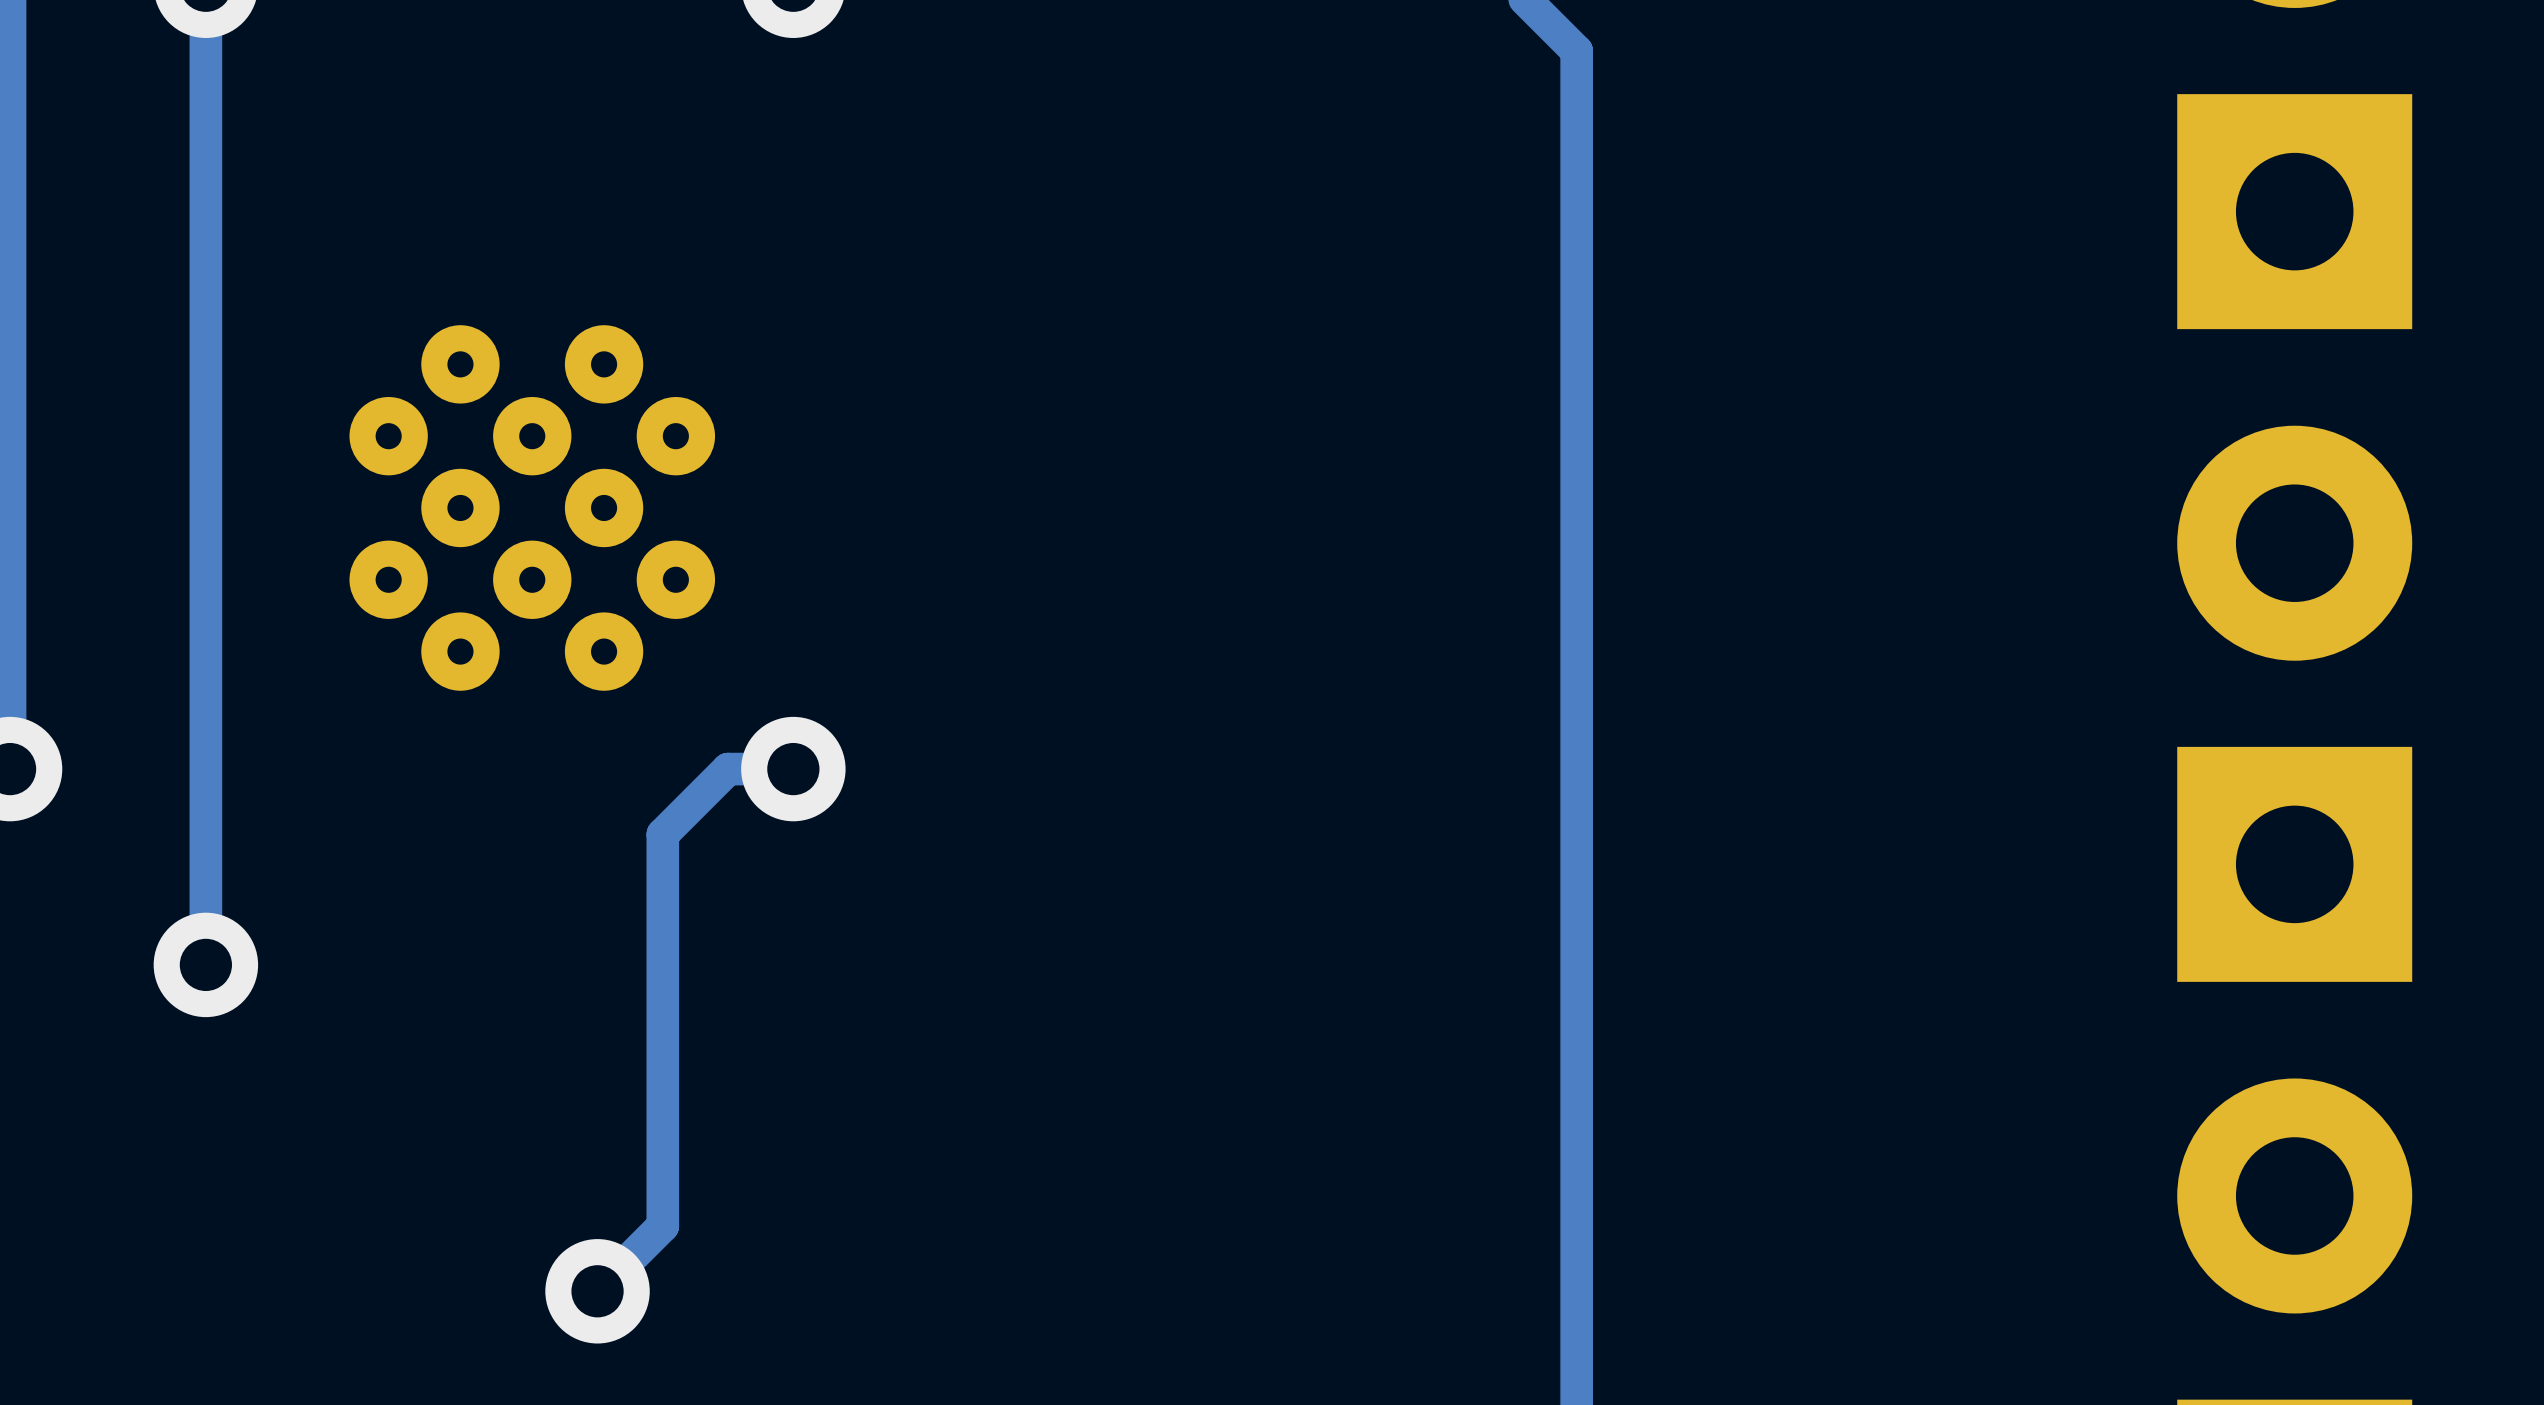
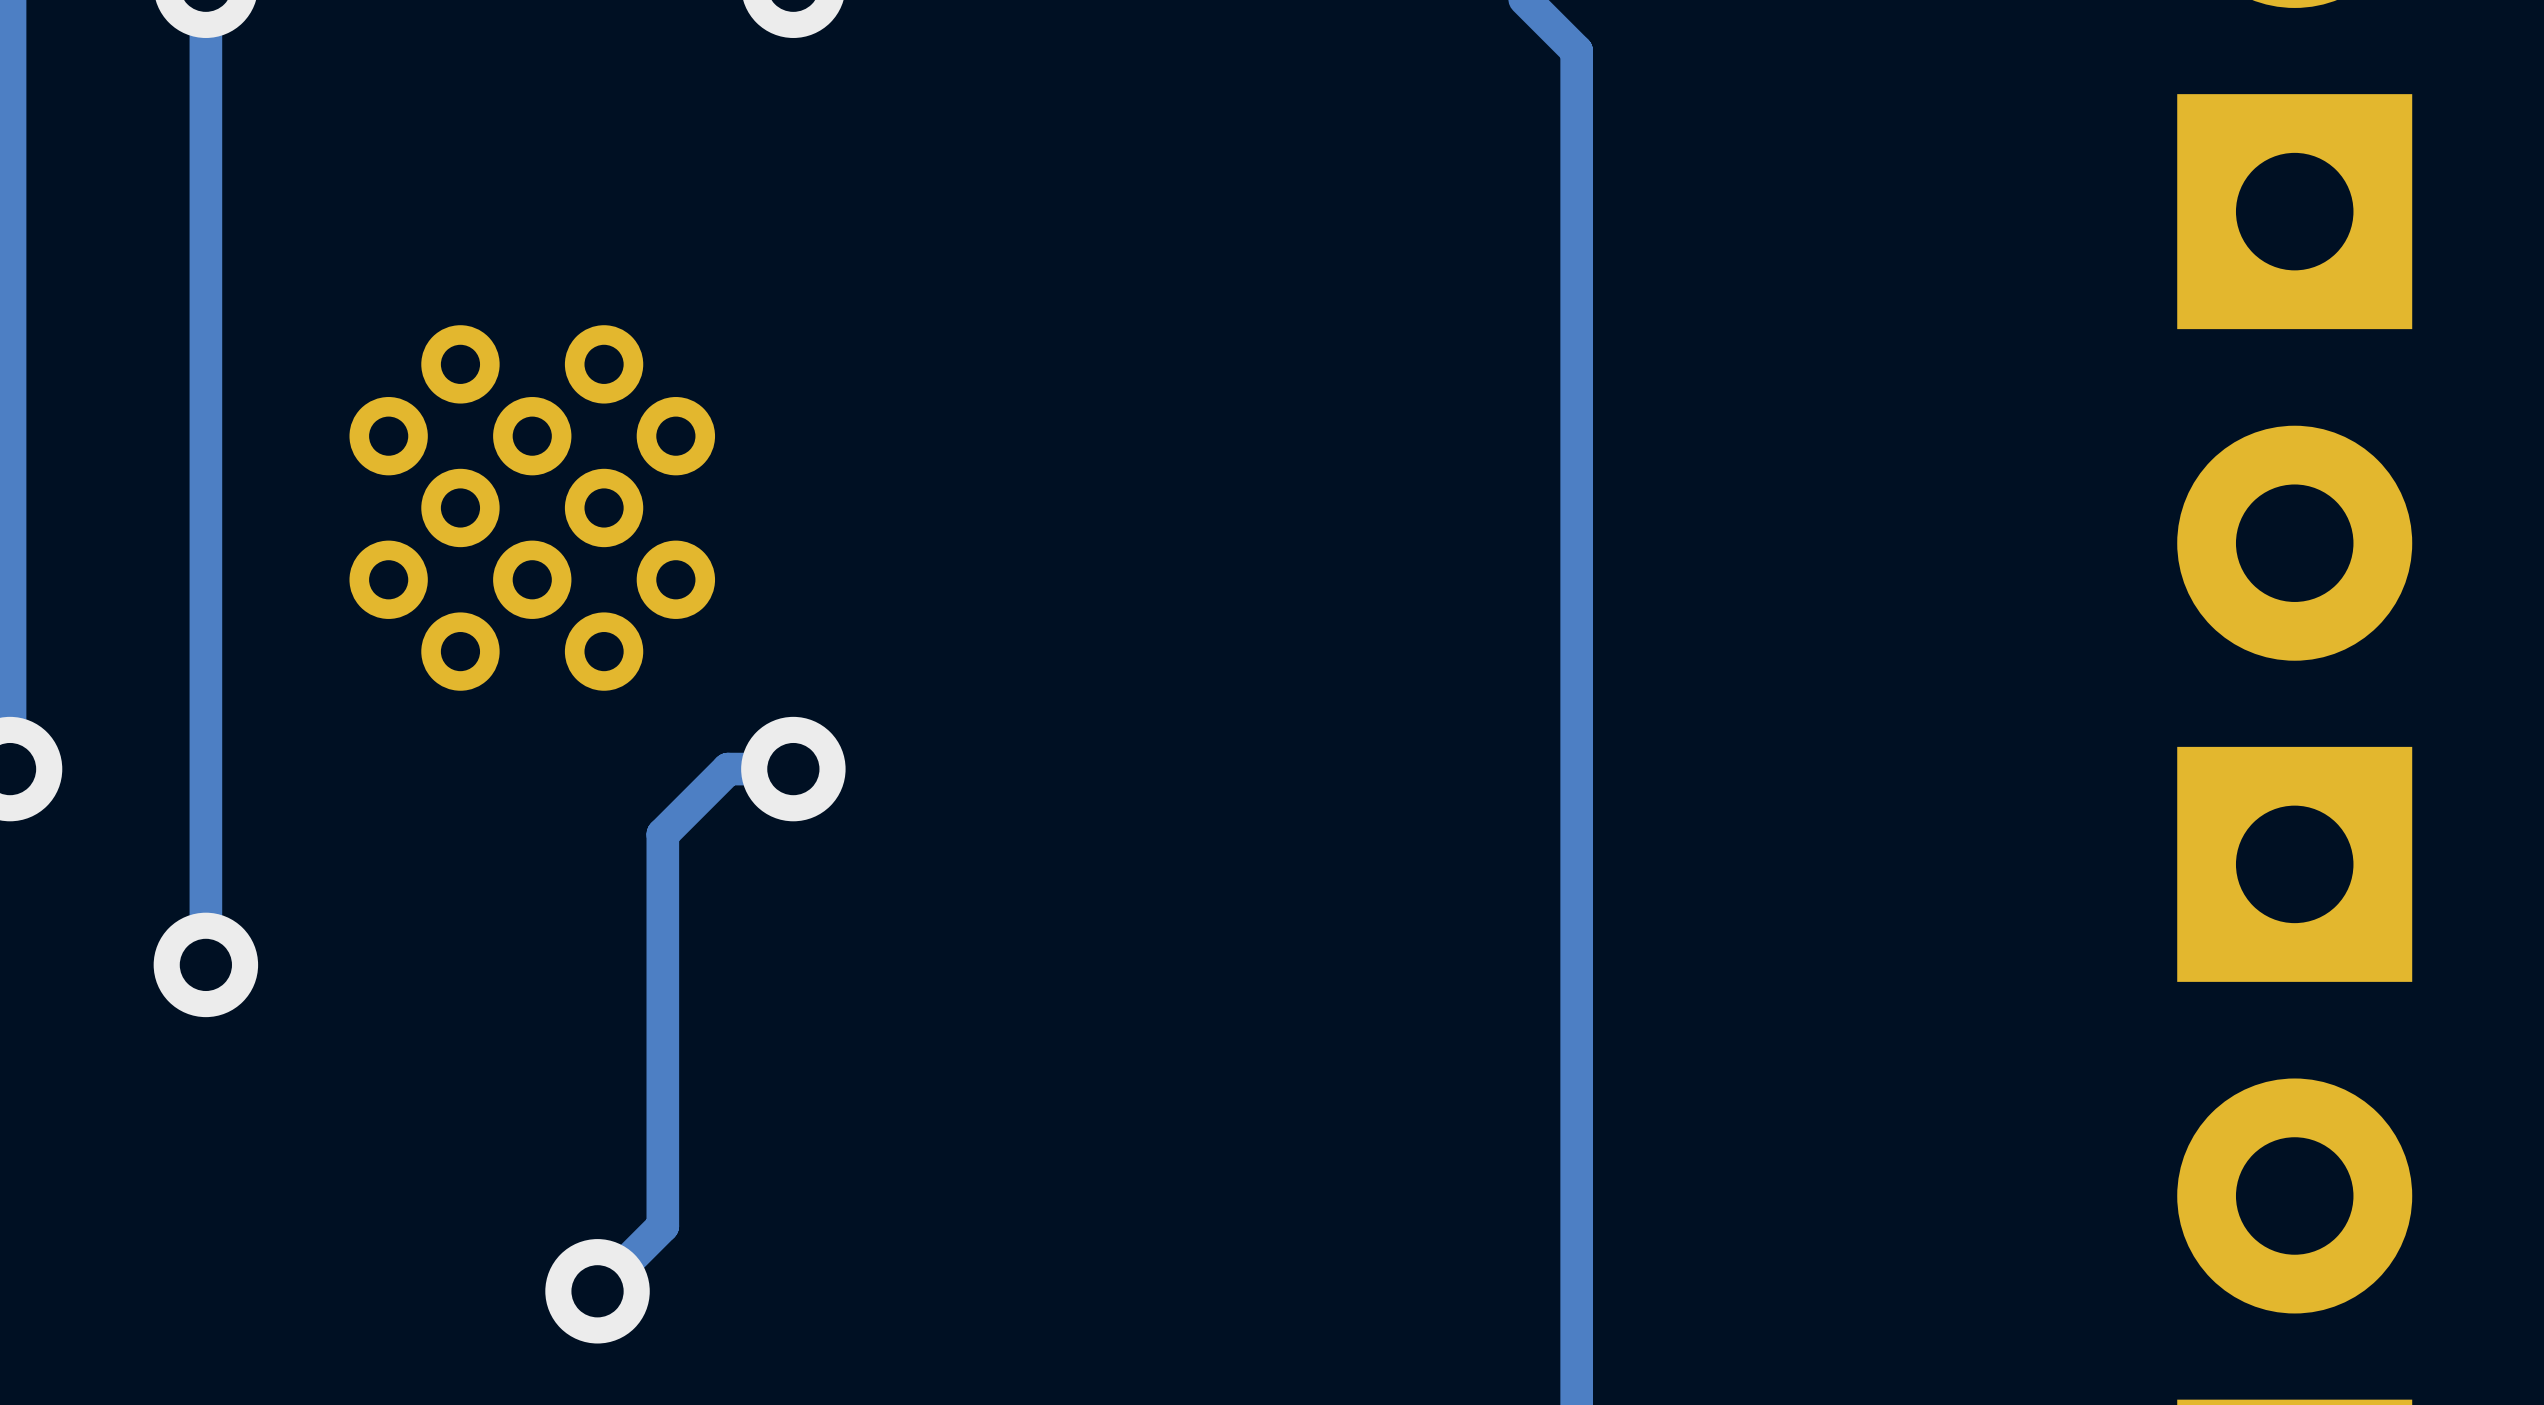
part footprint: [349, 325, 716, 691] -> [349, 325, 716, 691]

